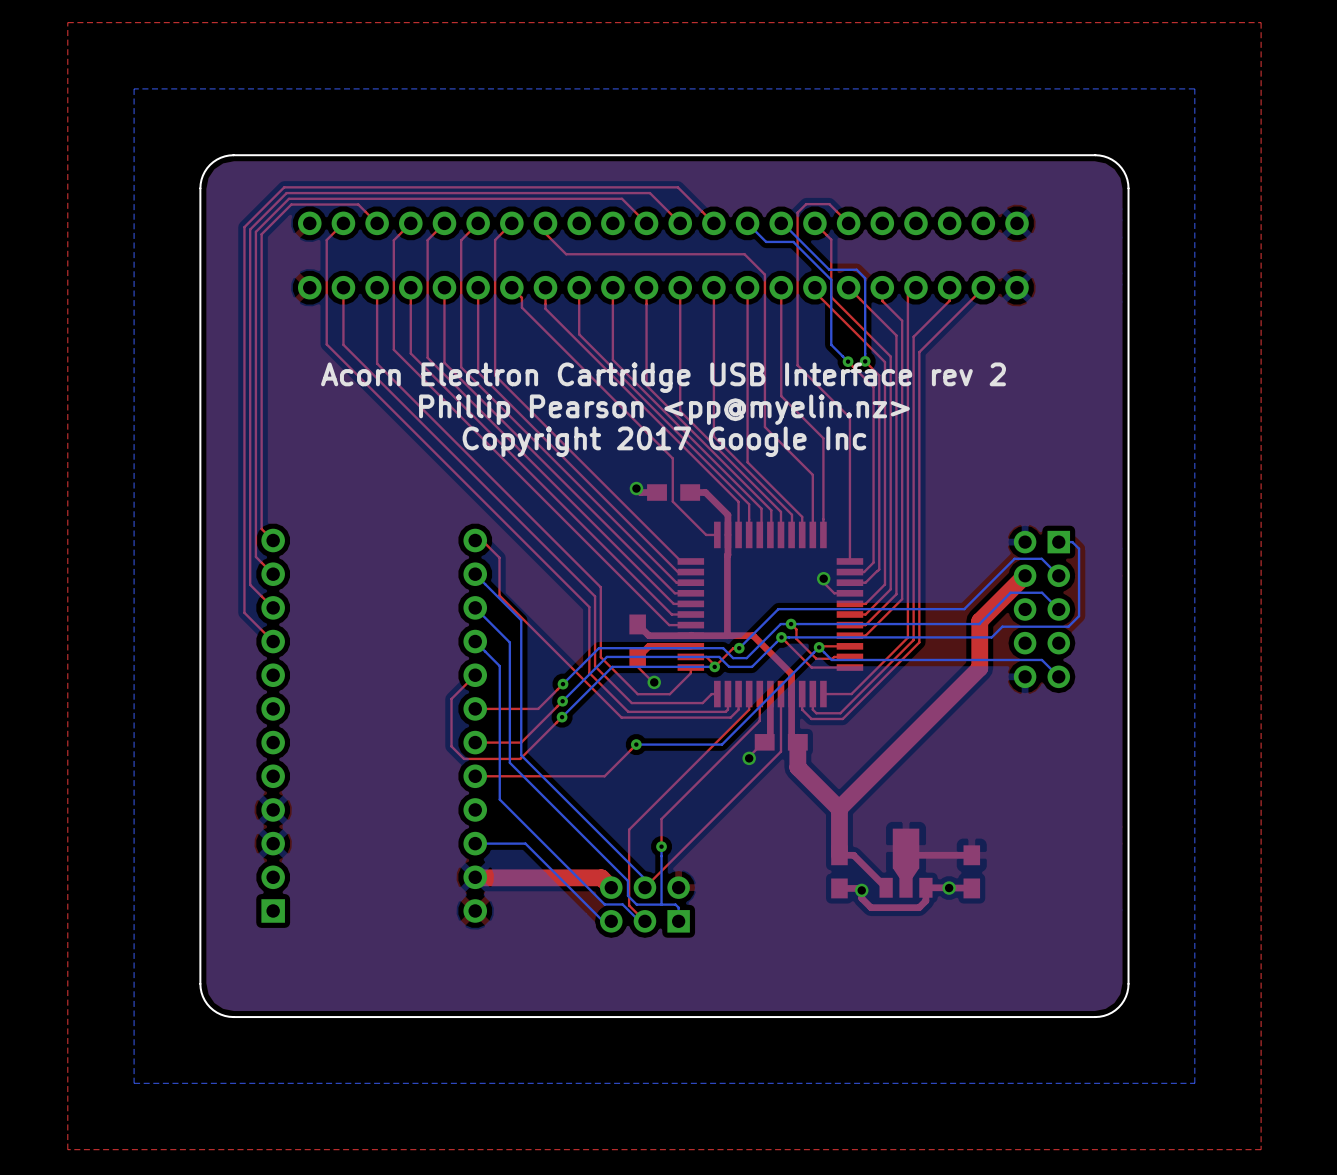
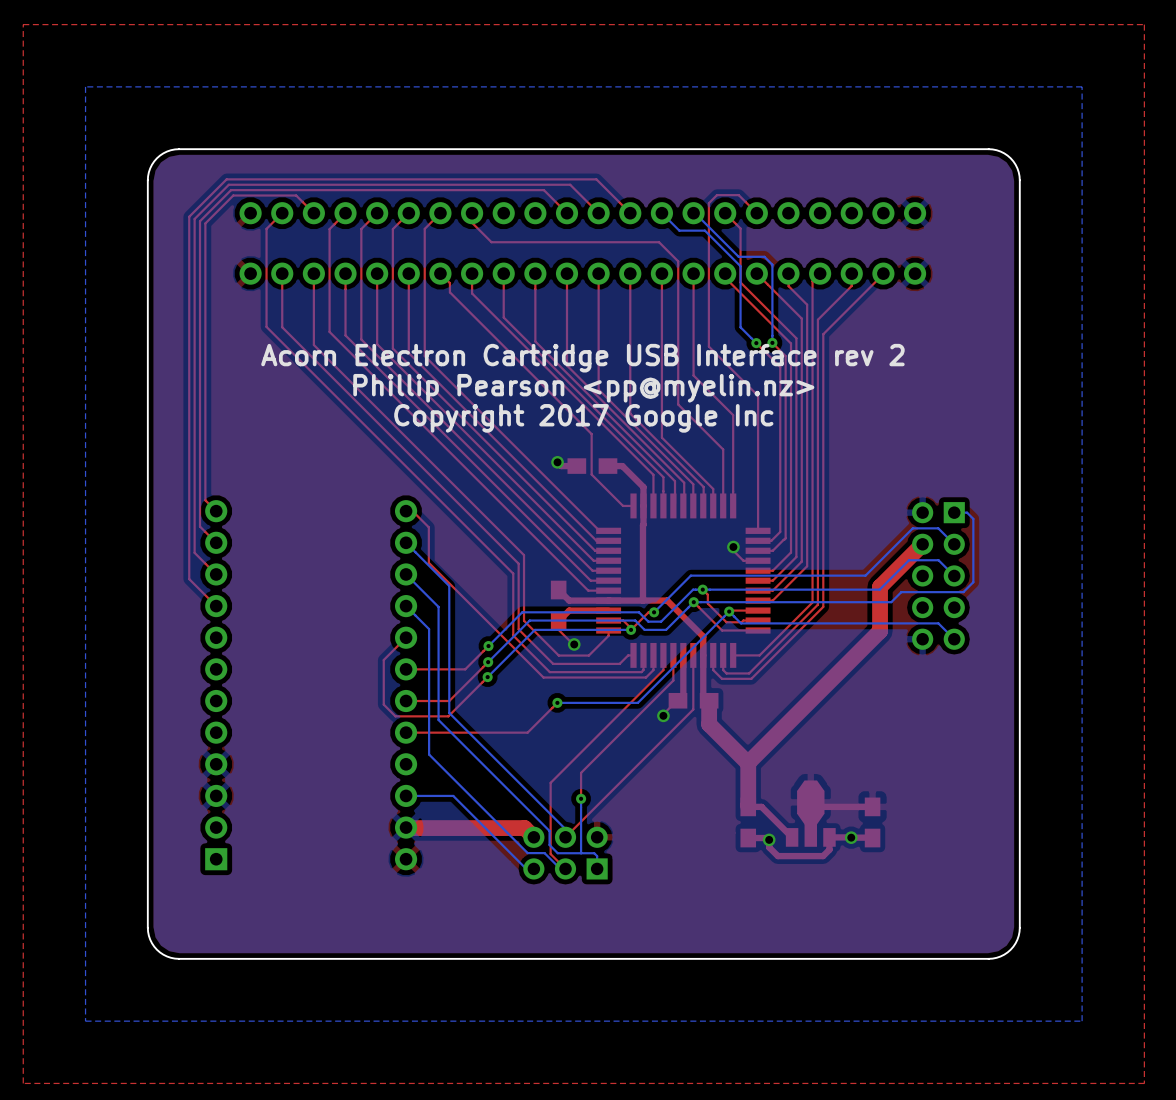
part footprint: [879, 828, 933, 898] -> [785, 780, 836, 847]

